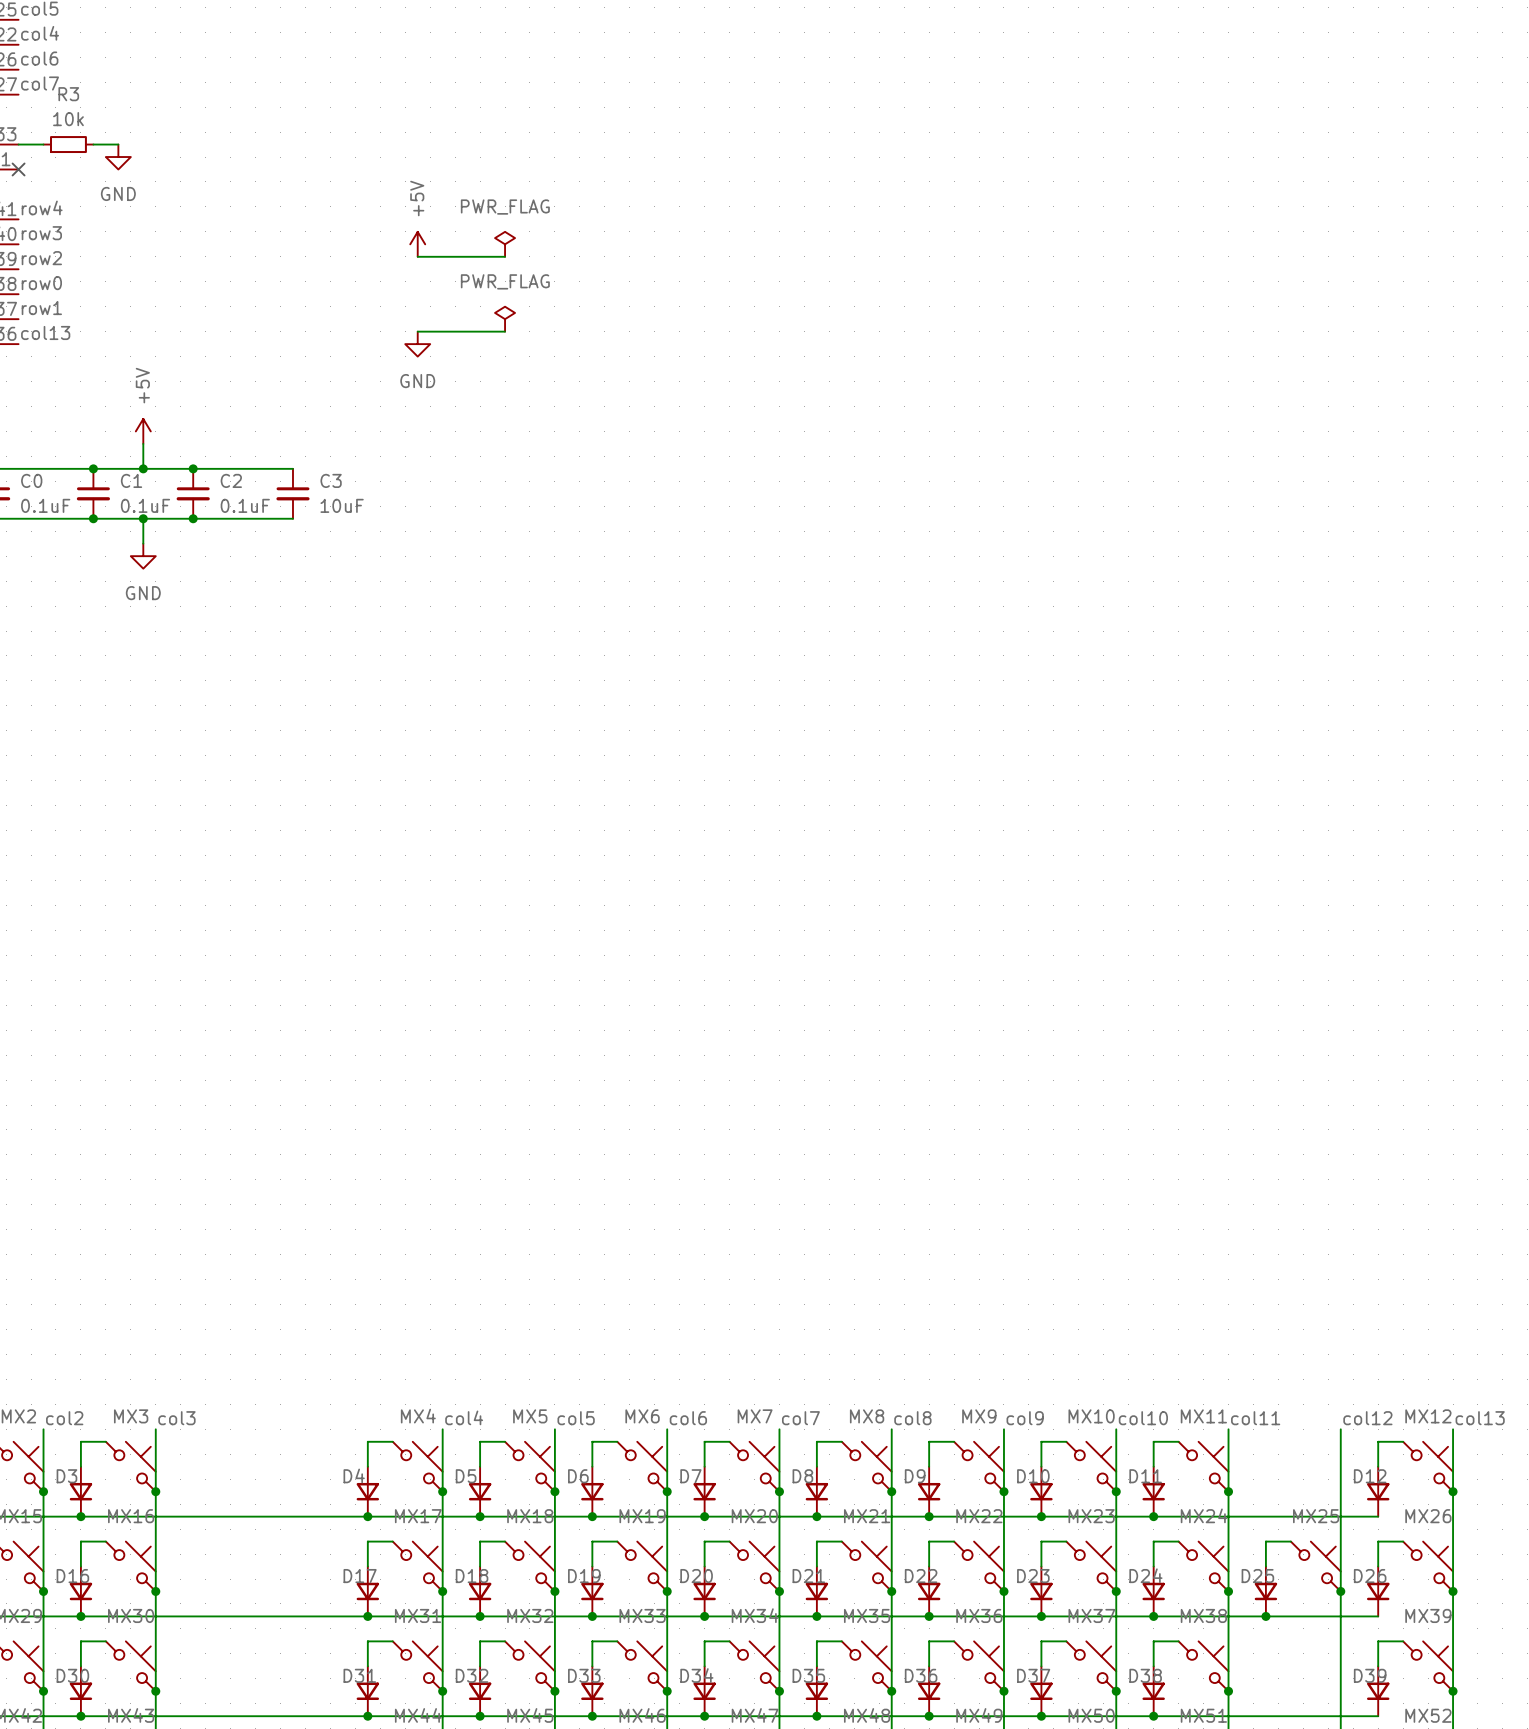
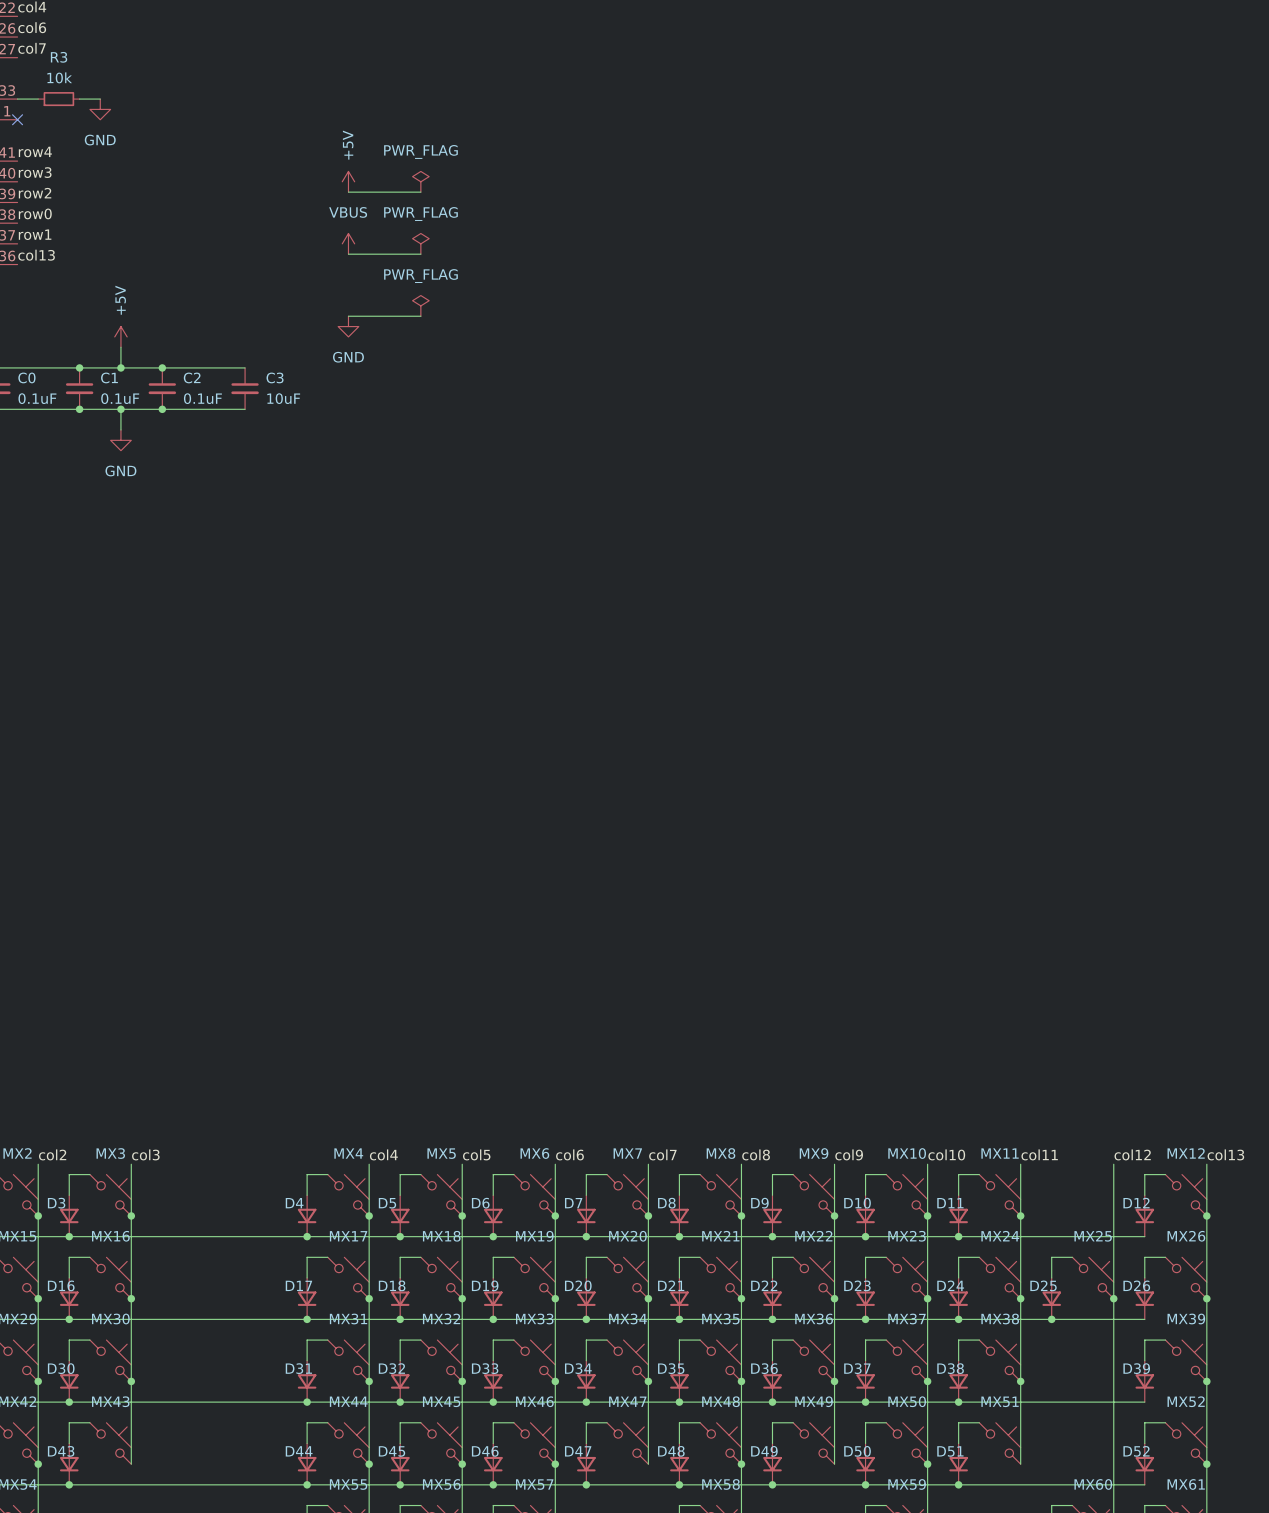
power symbol: none -> VBUS (348, 243)
power symbol position: GND (417, 344) -> GND (348, 326)
power symbol: none -> PWR_FLAG (420, 305)
wire: none -> (348, 316) (420, 316)

